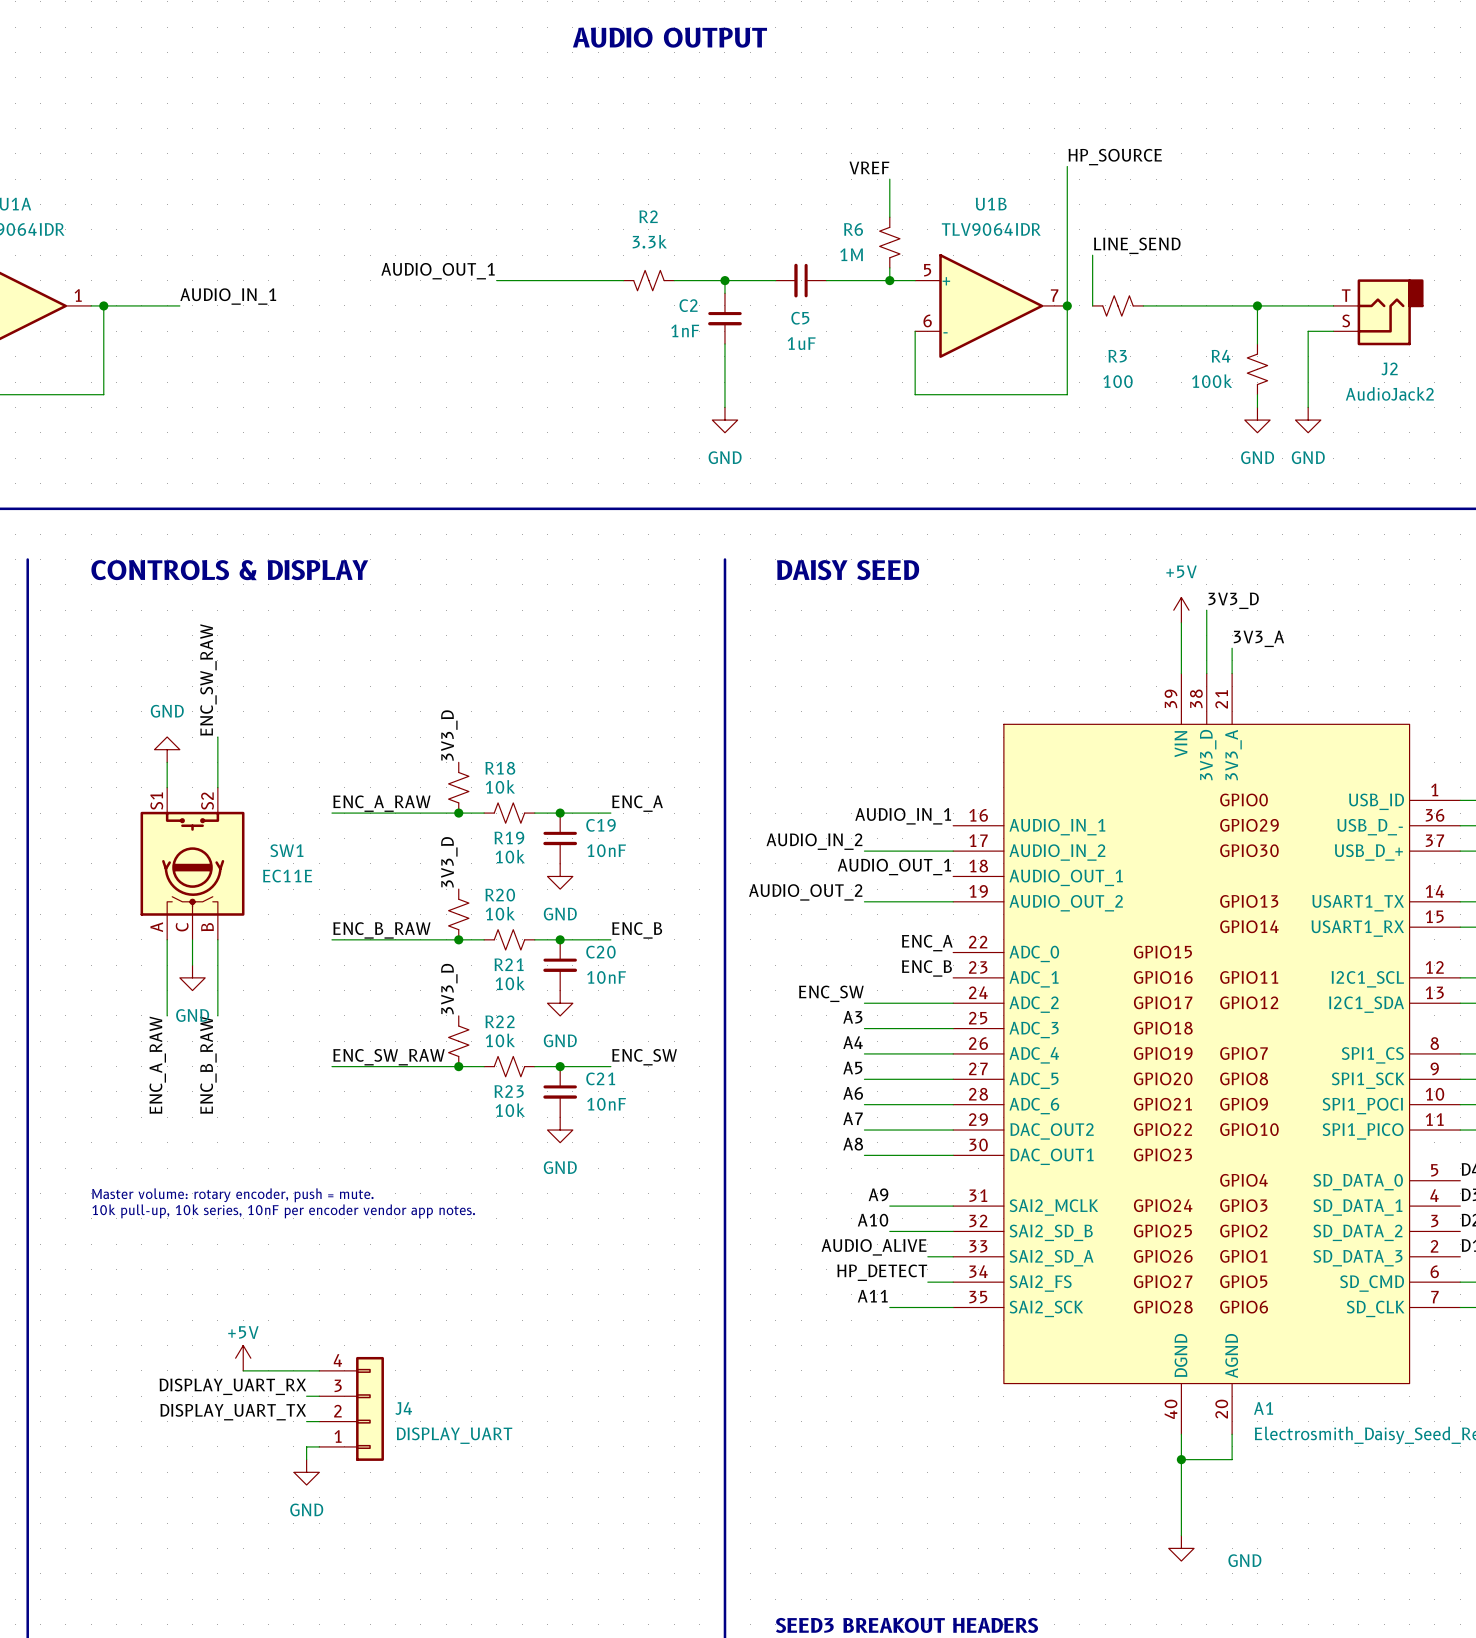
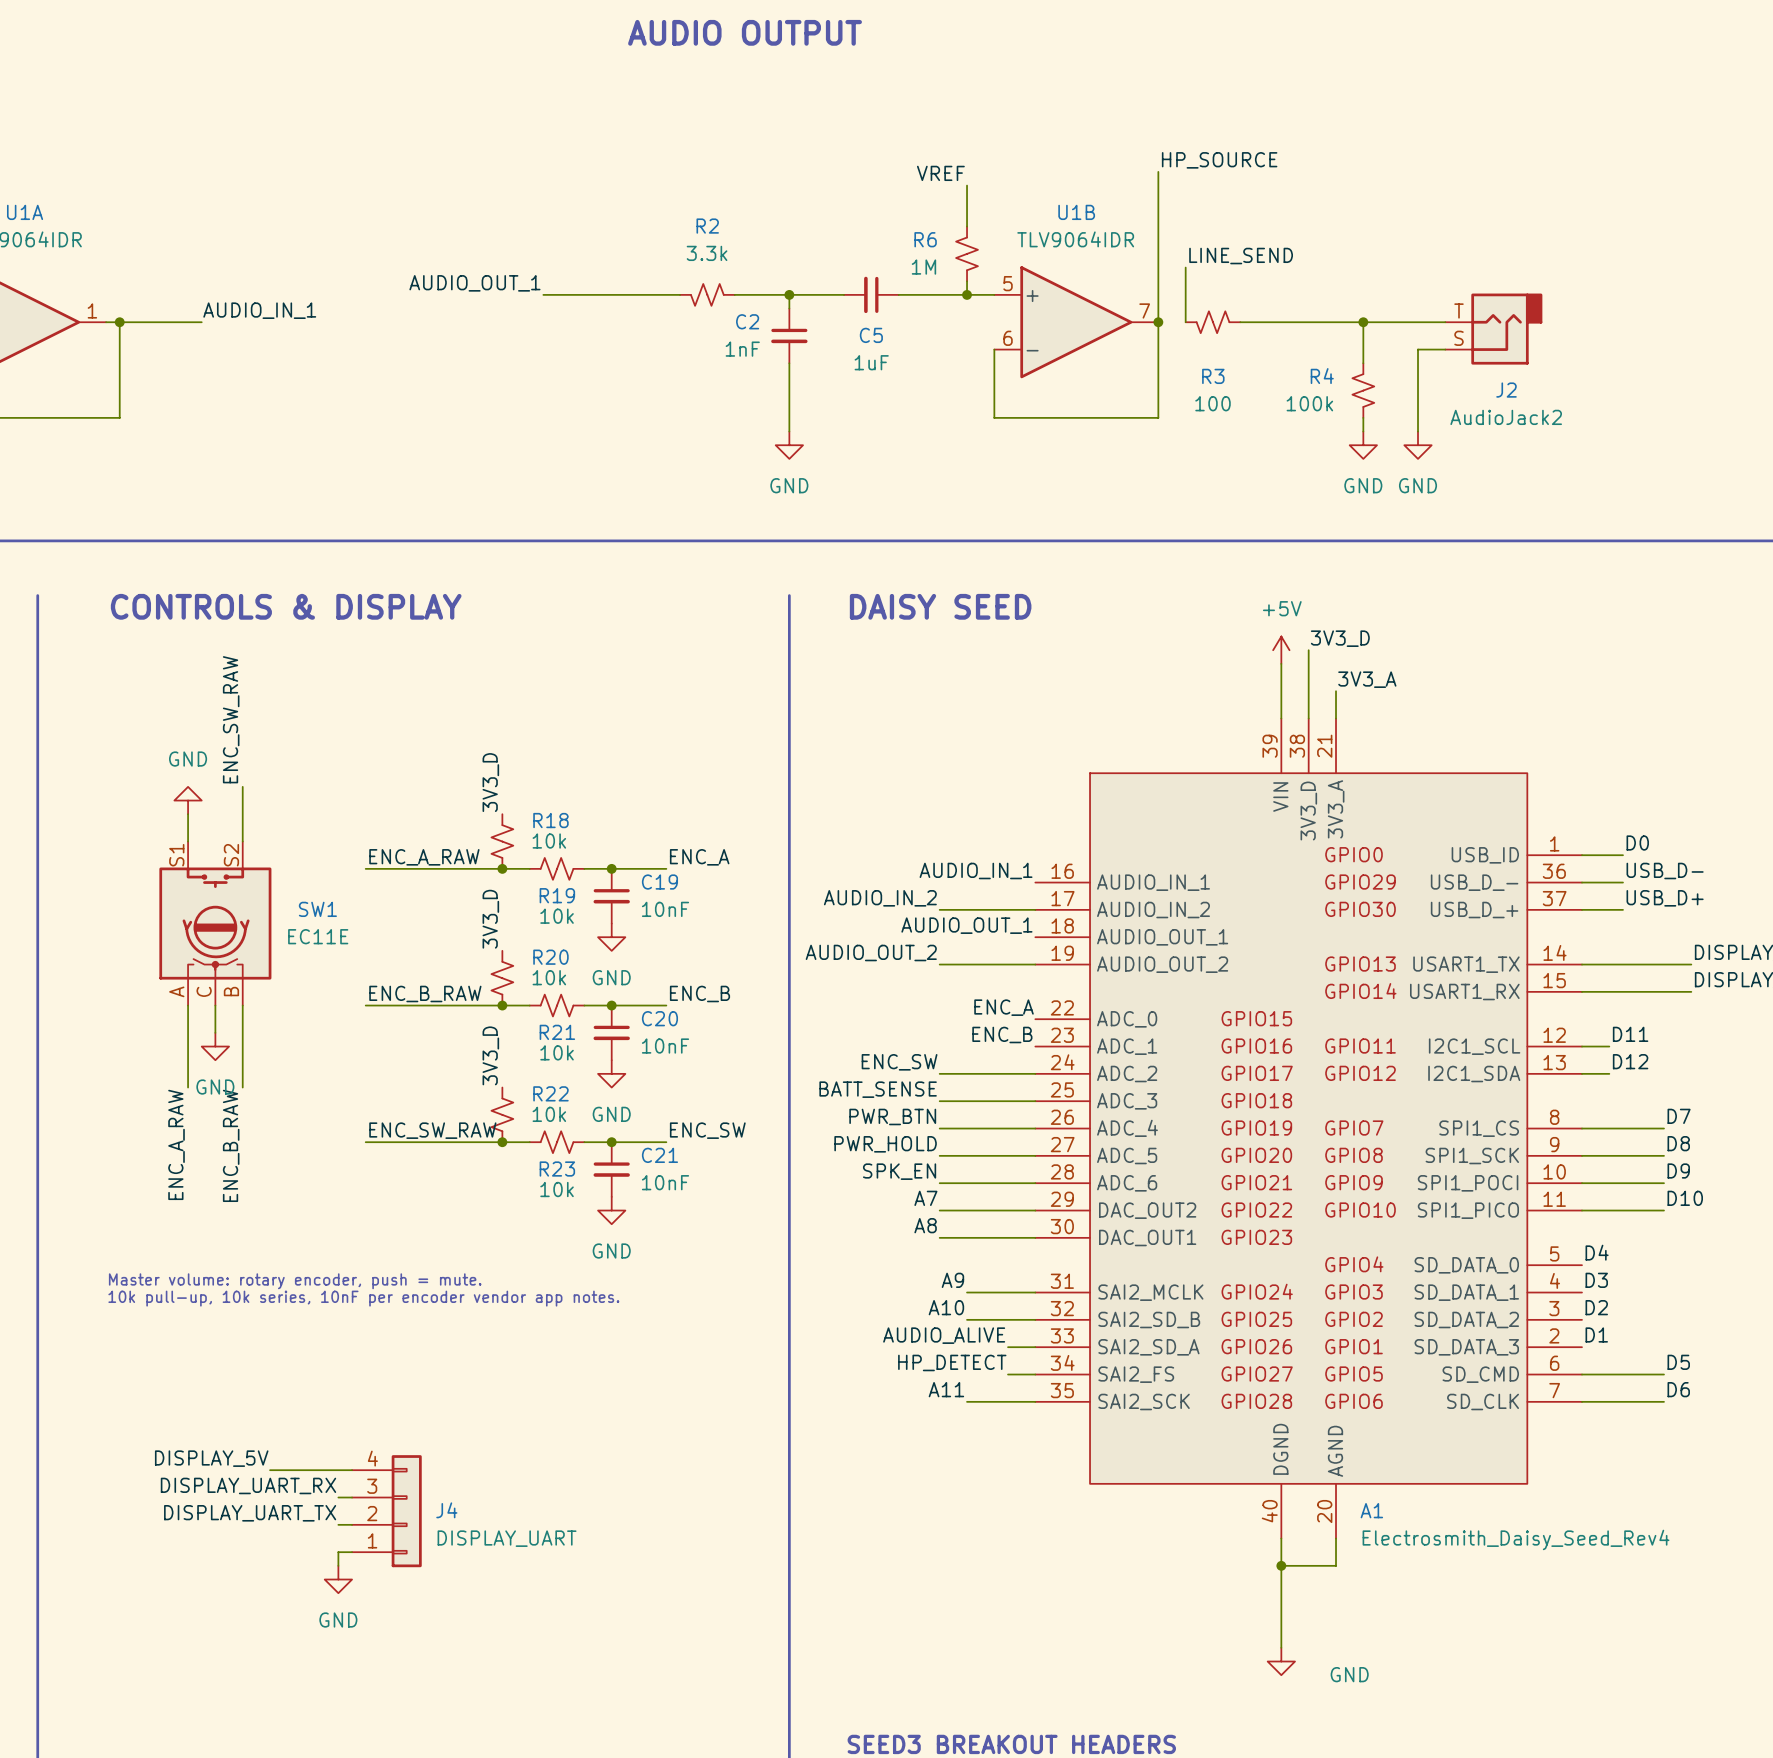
label: A3 (852, 1017) -> BATT_SENSE (878, 1089)
label: A4 (853, 1042) -> PWR_BTN (892, 1116)
label: A5 (852, 1067) -> PWR_HOLD (885, 1144)
label: A6 (853, 1093) -> SPK_EN (899, 1171)
power symbol: +5V (243, 1358) -> none
label: none -> DISPLAY_5V (211, 1458)

